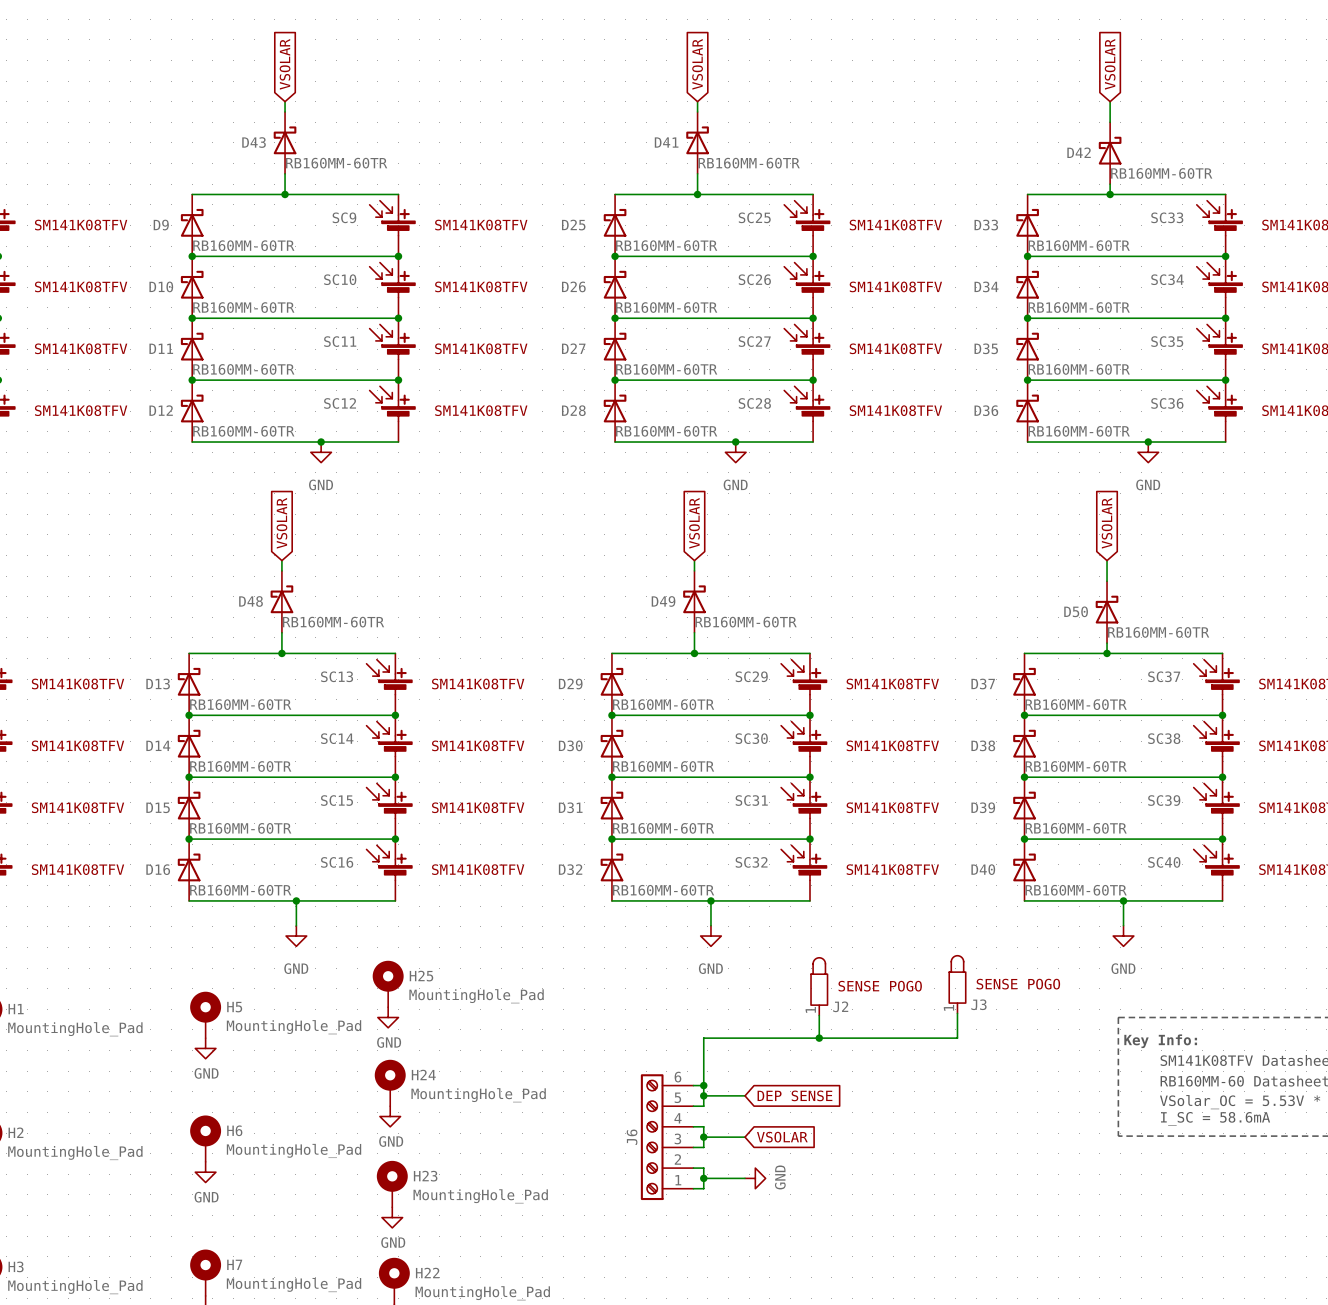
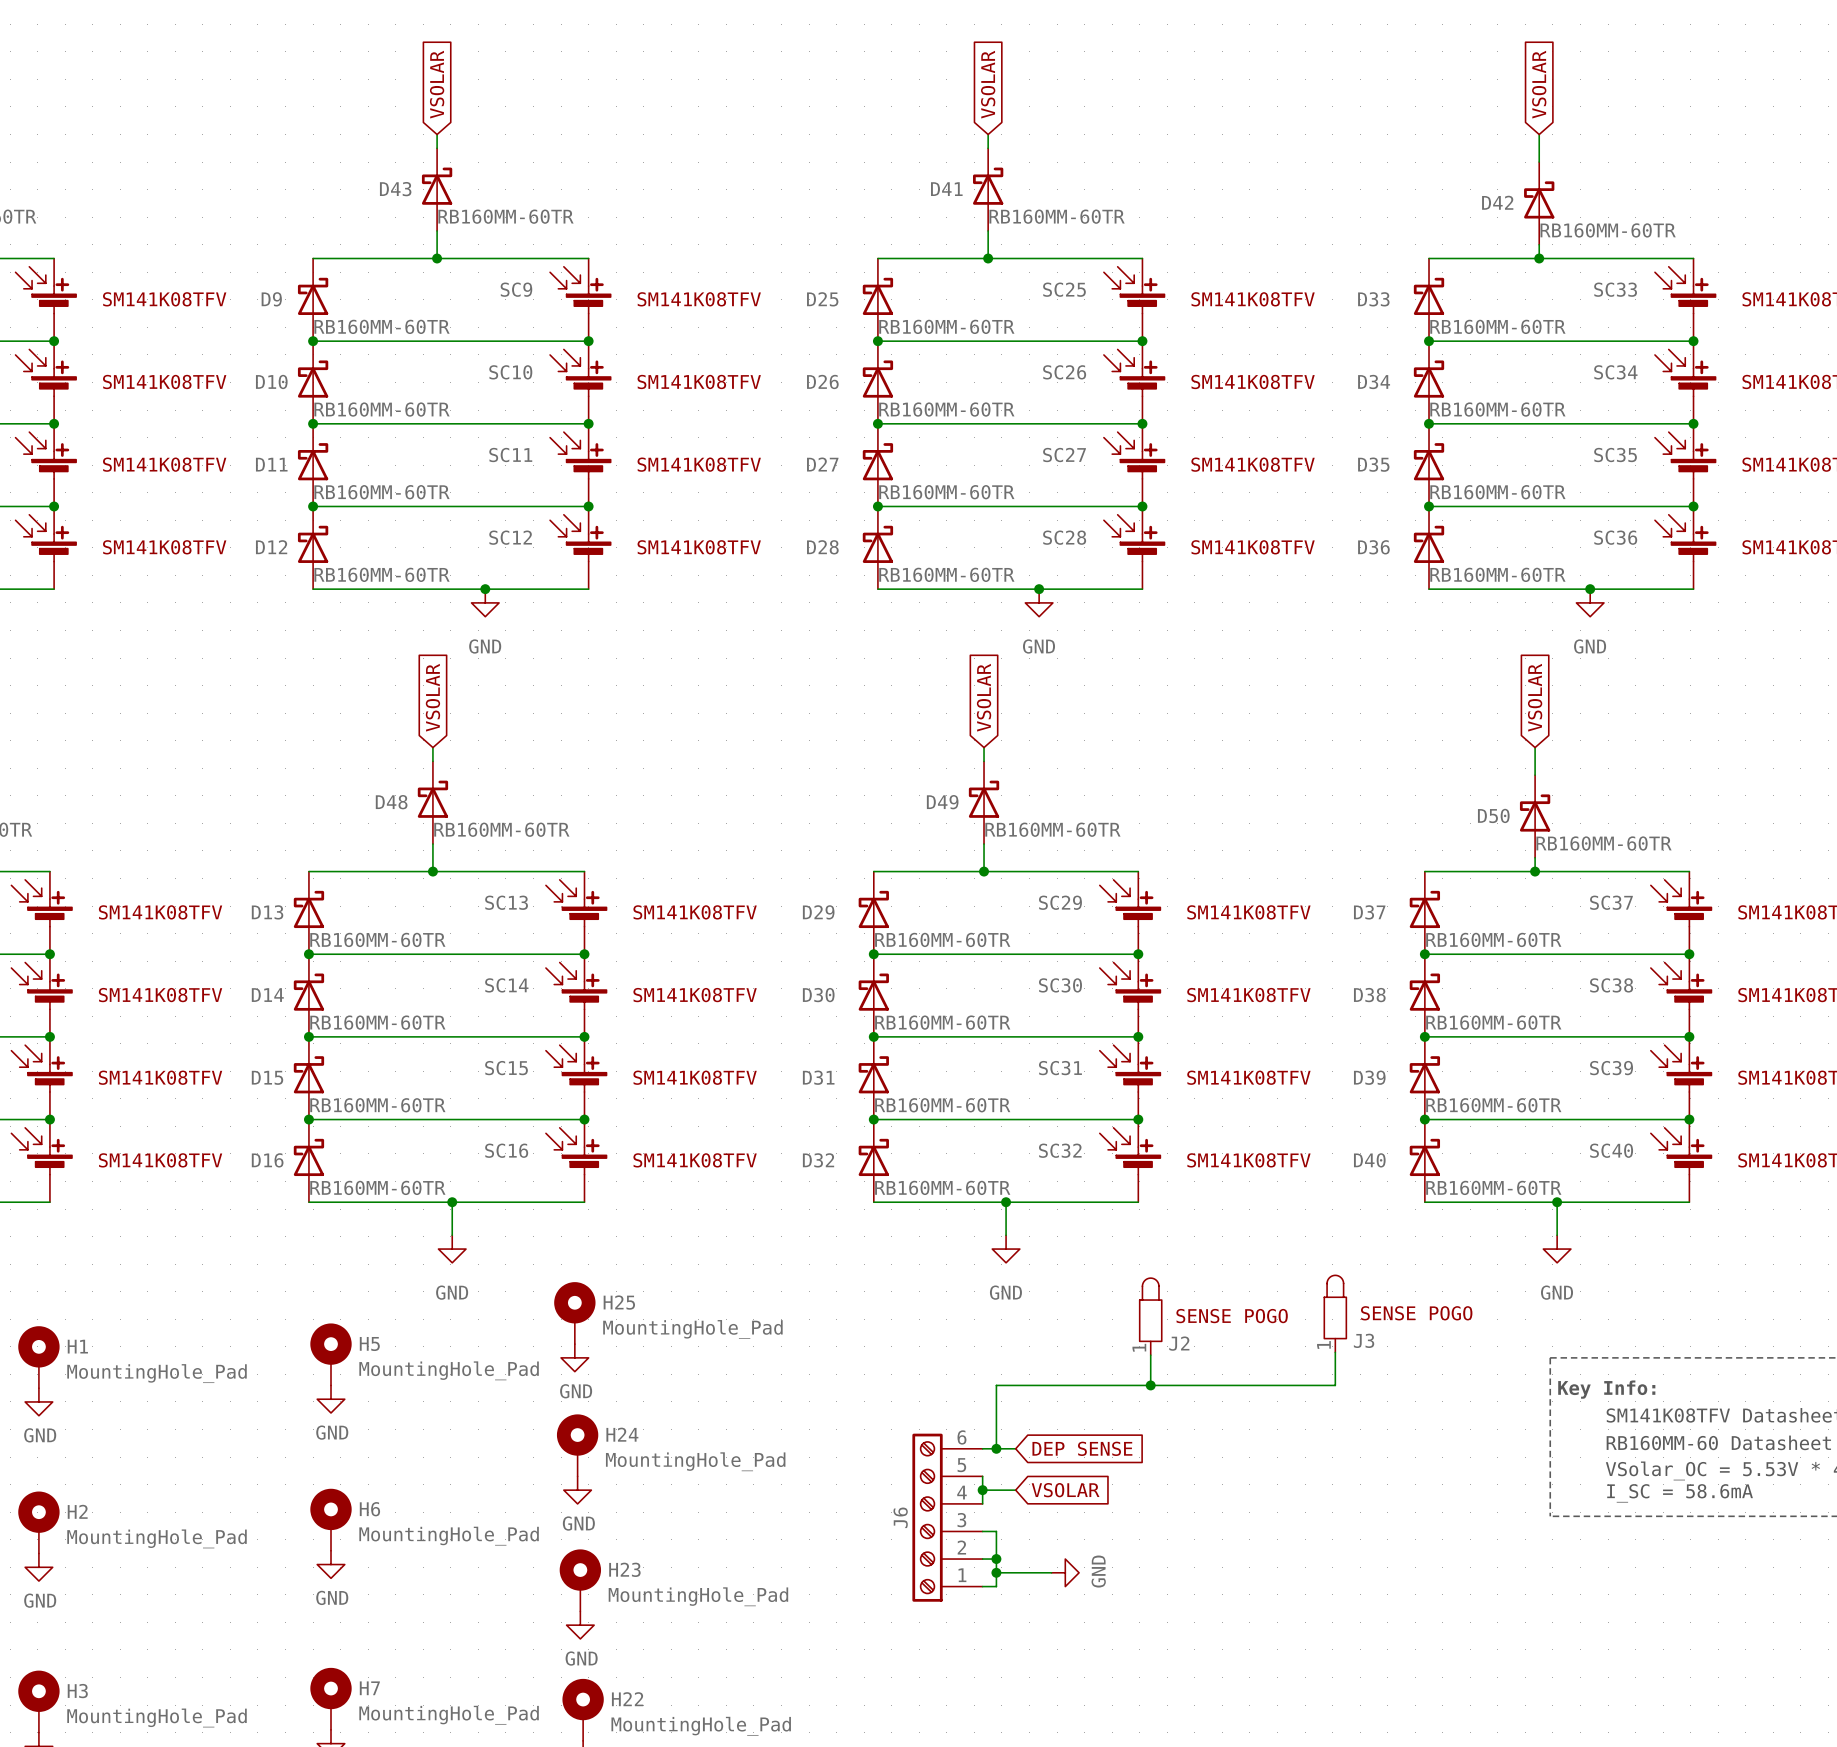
wire: (703, 1085) (703, 1106) (693, 1106) -> (996, 1448) (1015, 1448)
wire: (703, 1095) (745, 1095) -> none
junction: (703, 1095) -> none
global label position: DEP SENSE (794, 1095) -> DEP SENSE (1082, 1448)
wire: none -> (982, 1490) (1015, 1490)
junction: none -> (982, 1490)
wire: (693, 1126) (703, 1126) (703, 1147) -> (982, 1503) (982, 1476)
wire: (703, 1137) (745, 1137) -> none
junction: (703, 1137) -> none
global label position: VSOLAR (782, 1137) -> VSOLAR (1065, 1490)
wire: none -> (996, 1531) (996, 1559)
junction: none -> (996, 1559)

